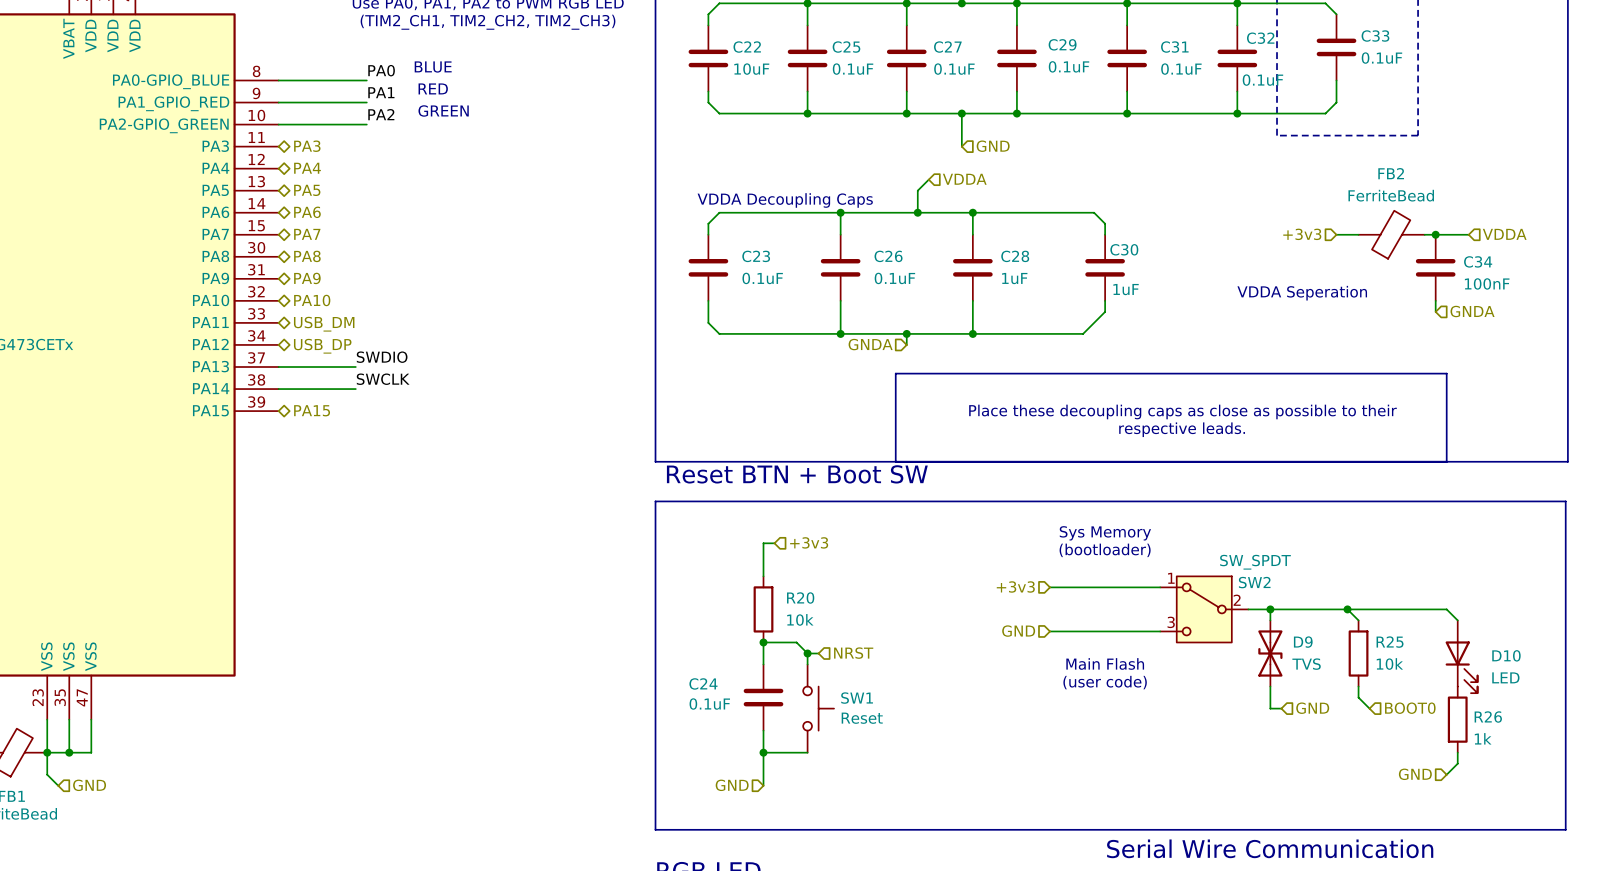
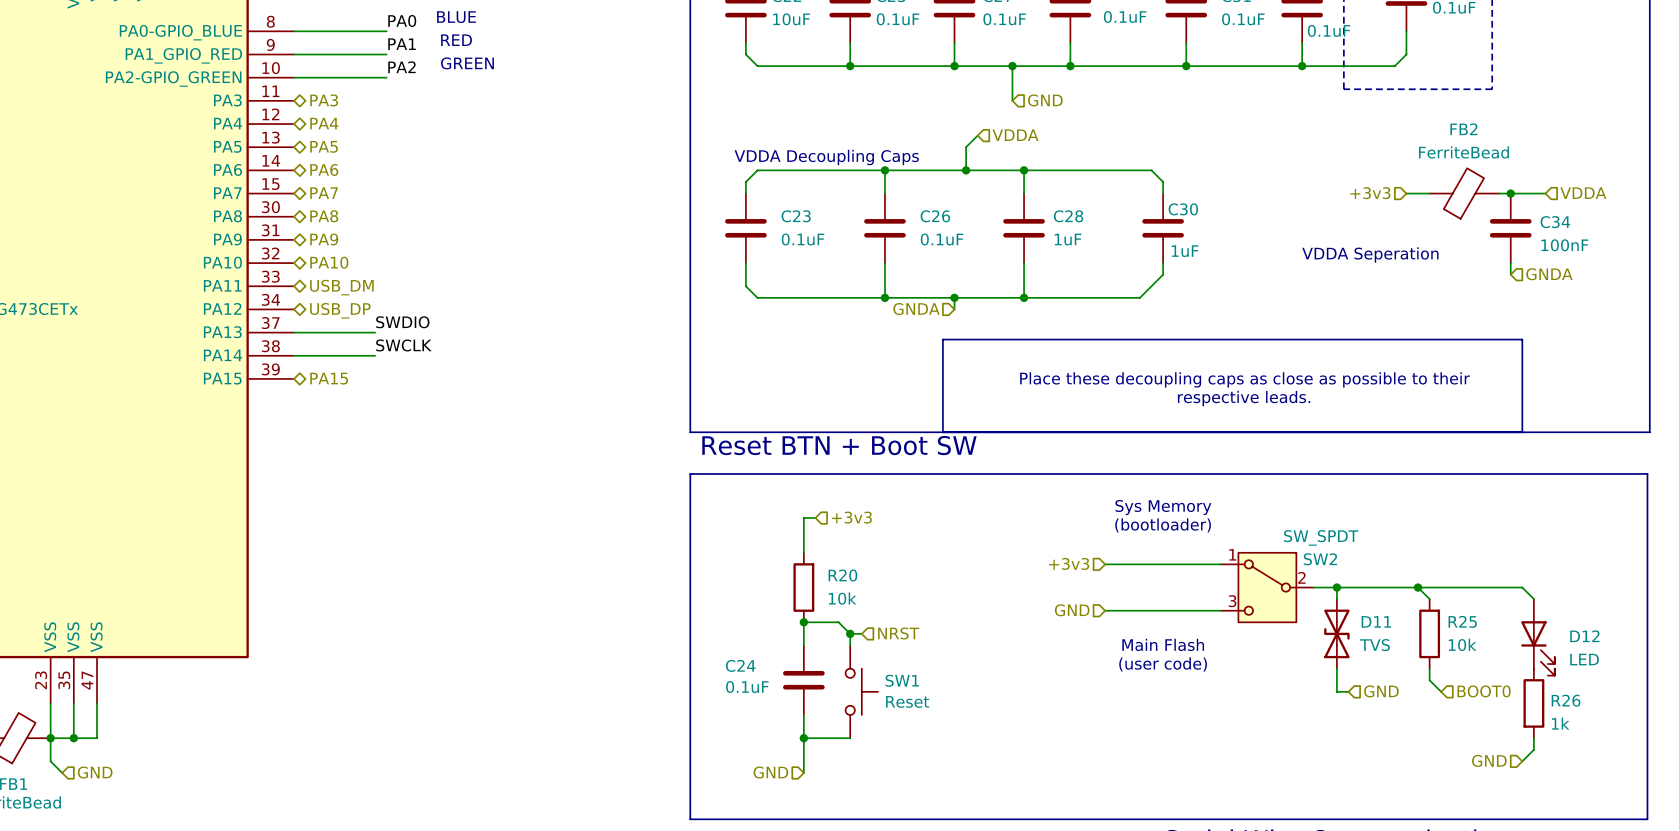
D9 name: D9 (1303, 642) -> D11 (1376, 621)
D10 name: D10 (1506, 655) -> D12 (1584, 636)

